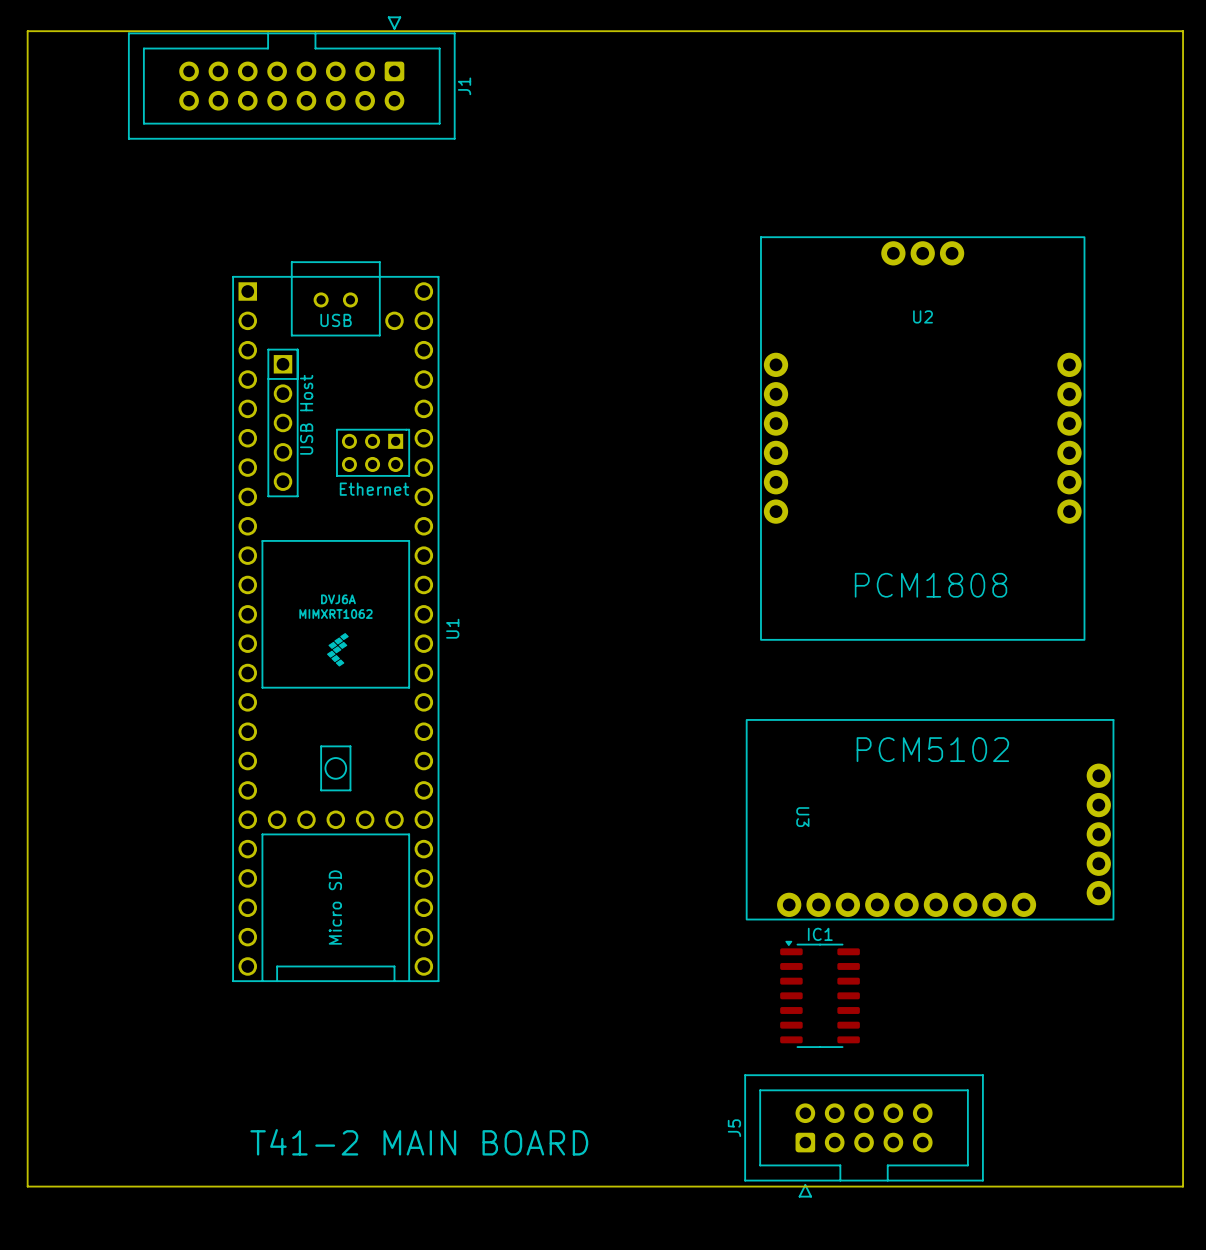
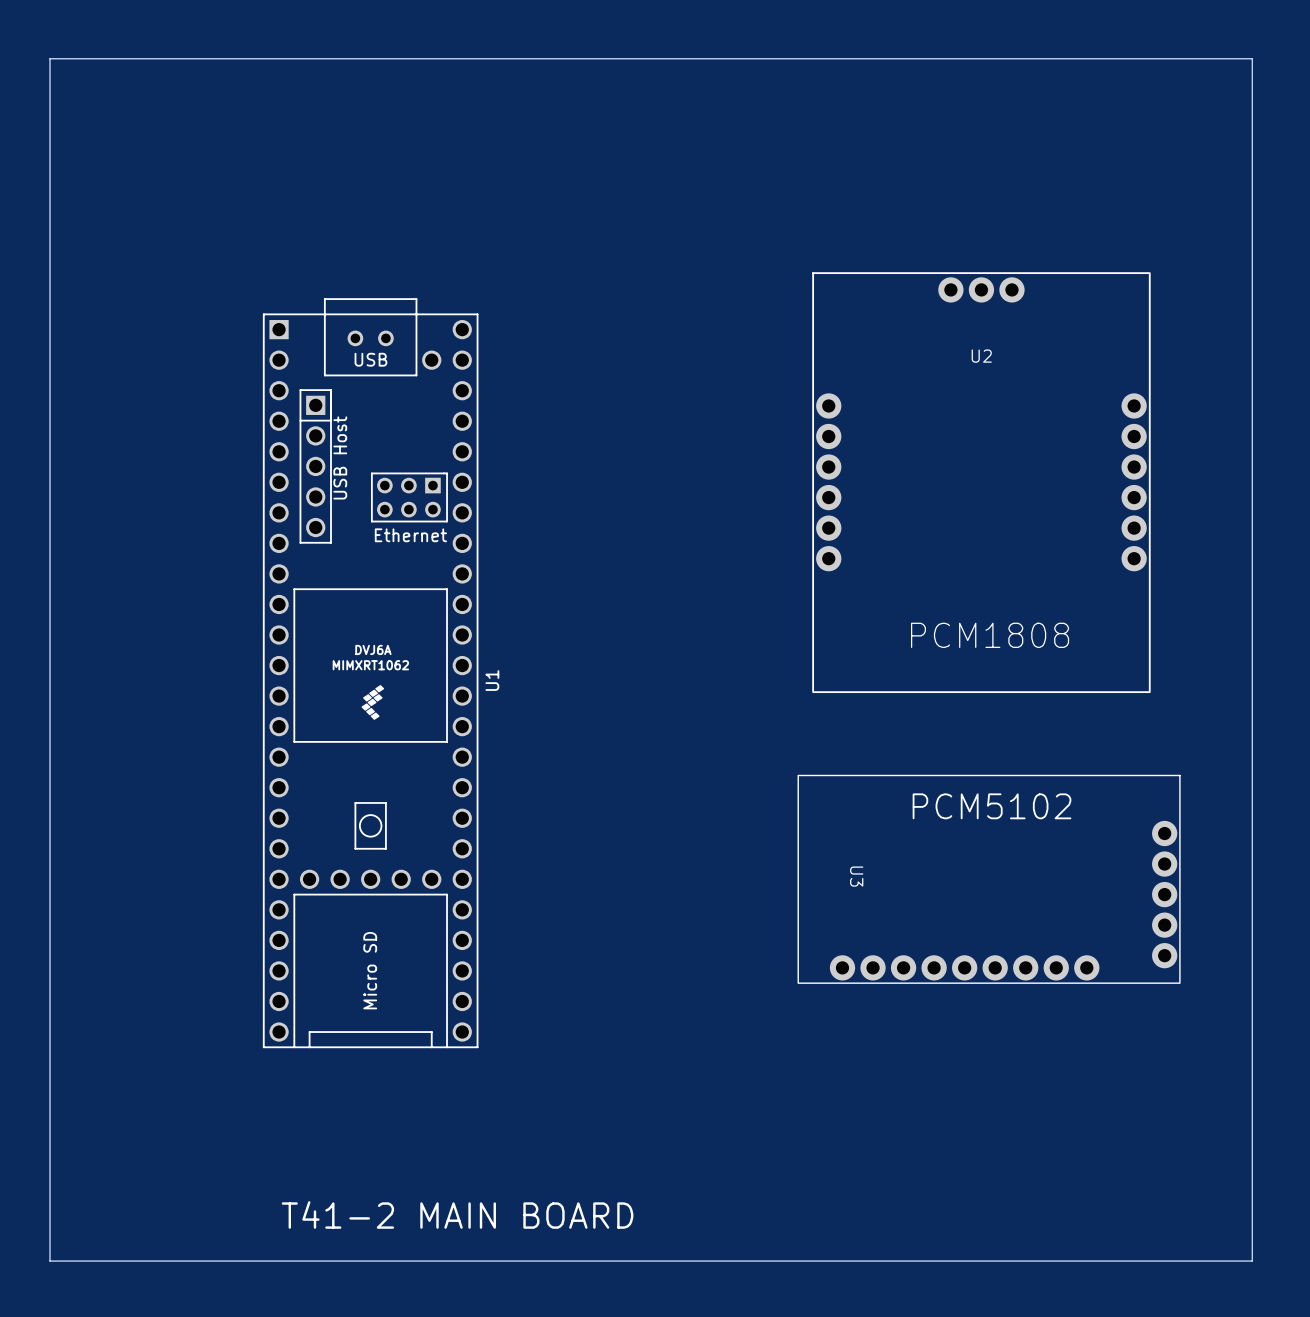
J1: (291, 78) -> none
IC1: (820, 994) -> none
J5: (864, 1135) -> none

